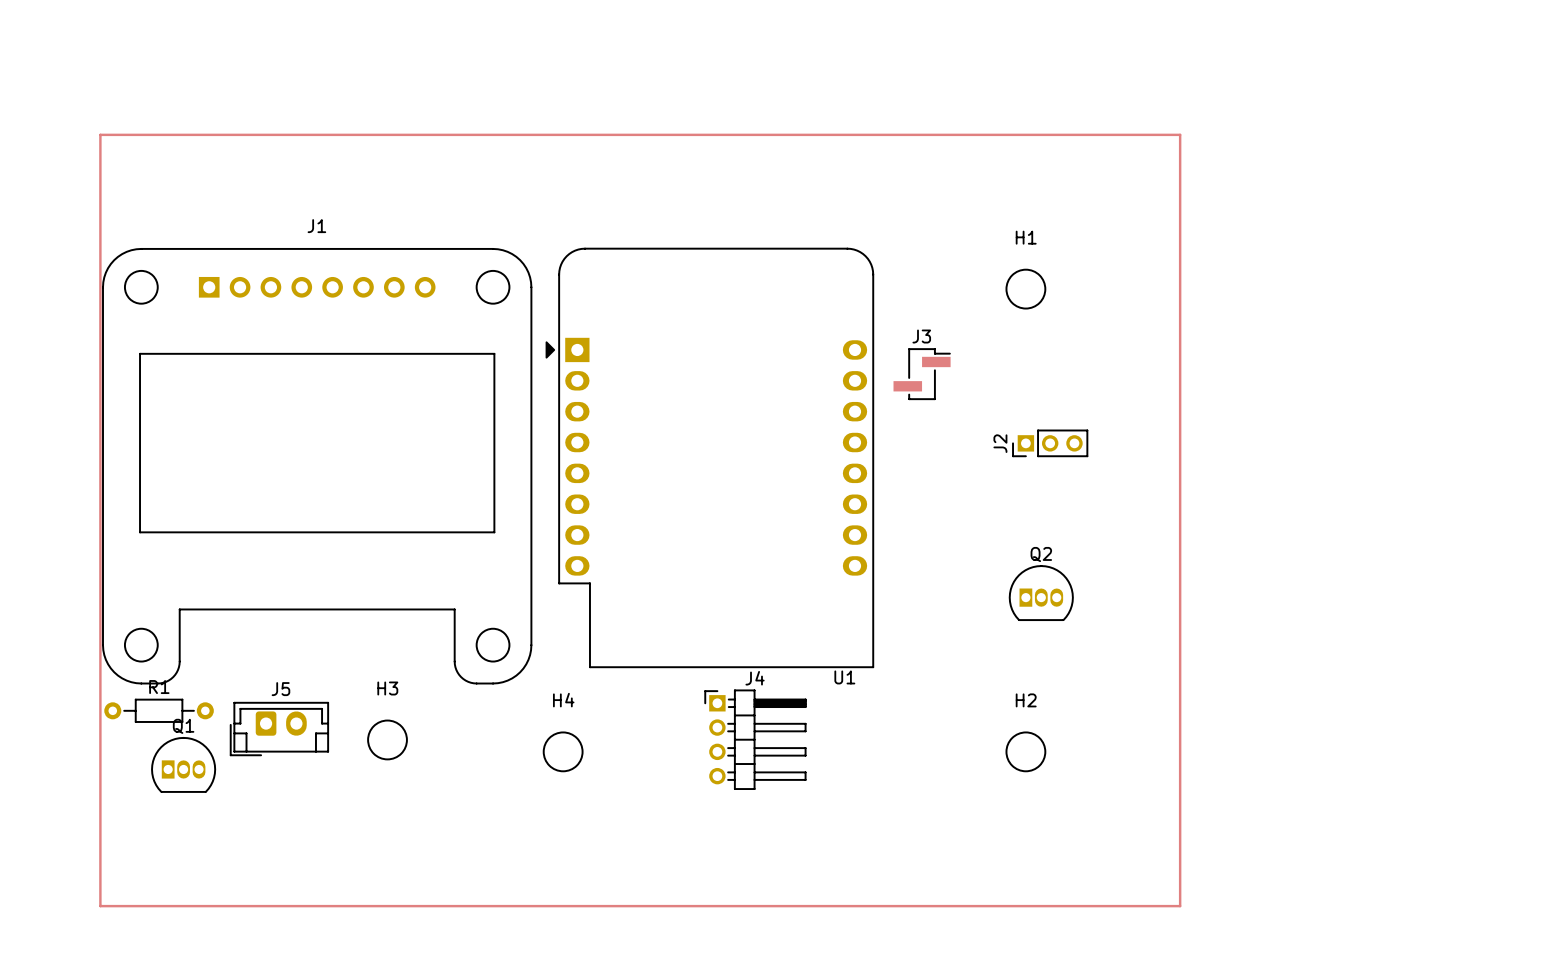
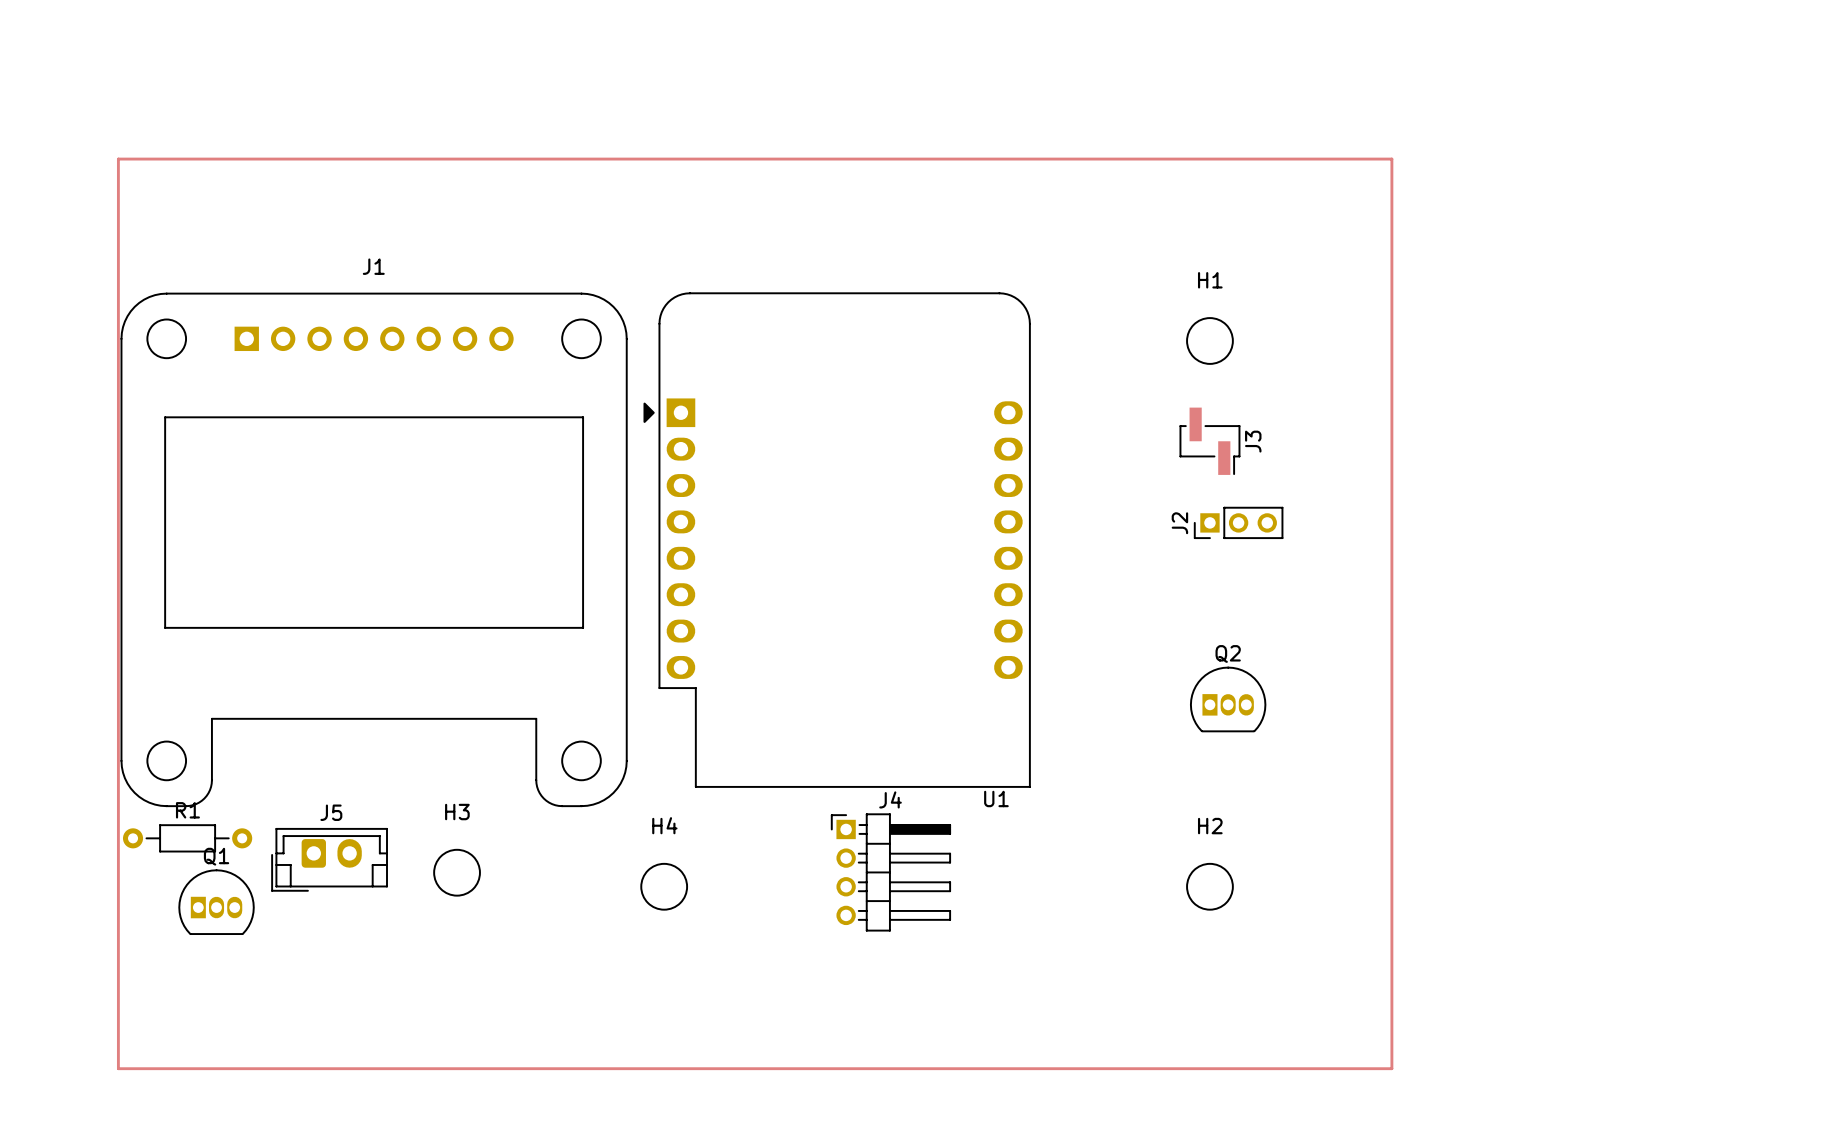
J3 rotation: 0° (922, 374) -> 90° clockwise (1209, 441)
J3 position: (922, 374) -> (1209, 441)

